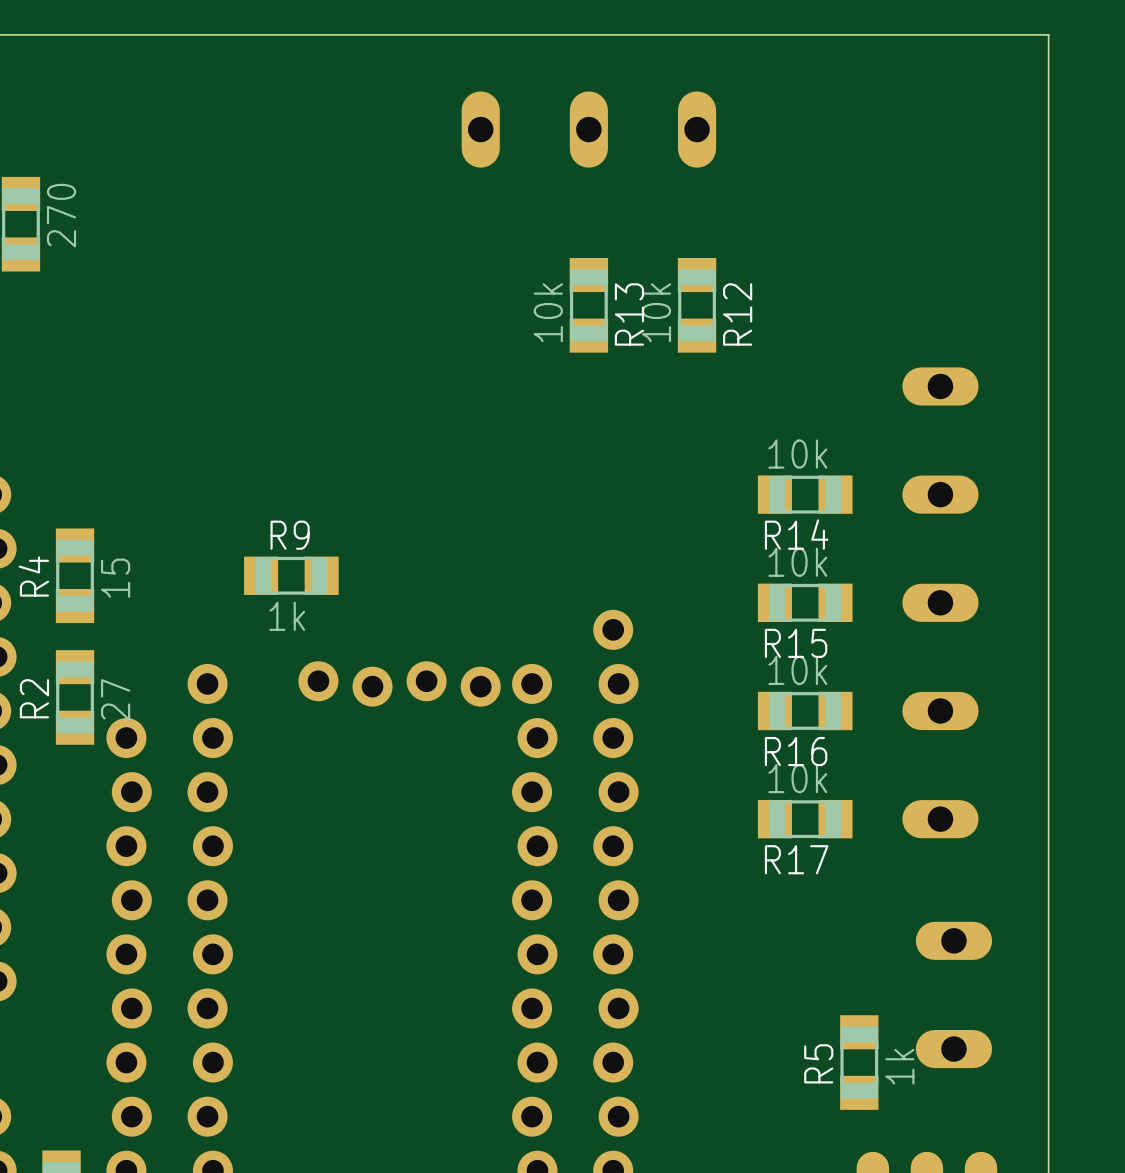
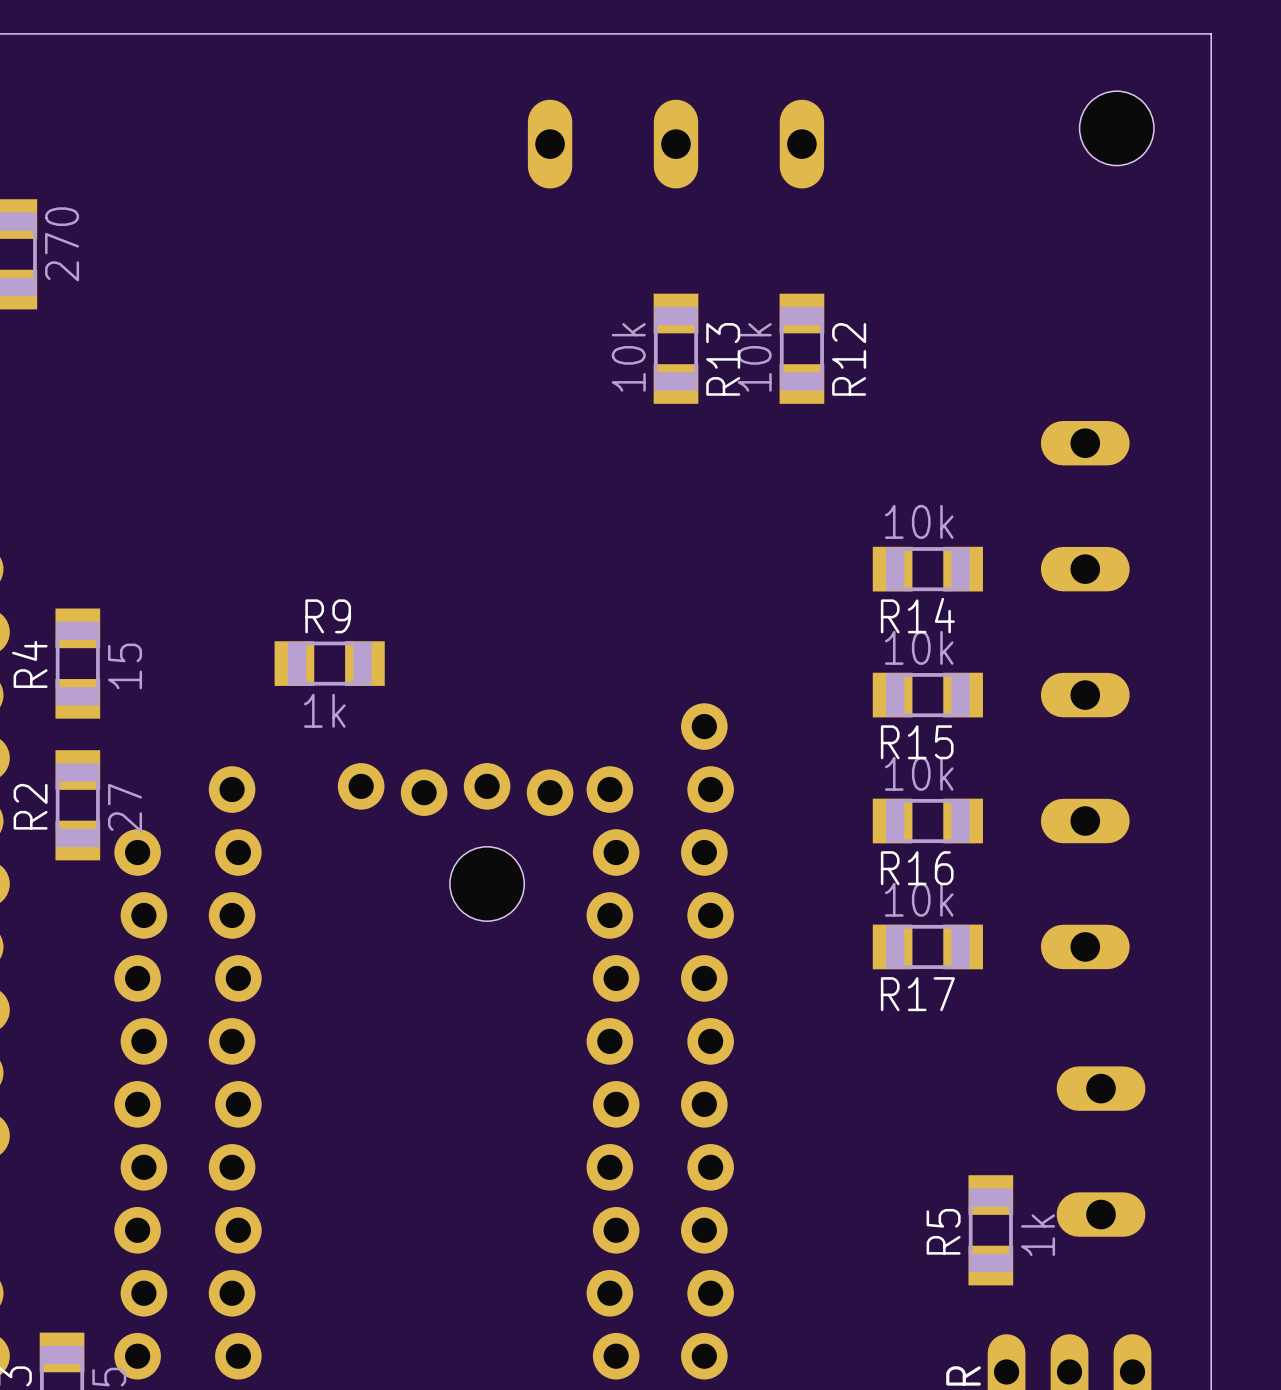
hole: none -> (1116, 128)
hole: none -> (487, 883)

